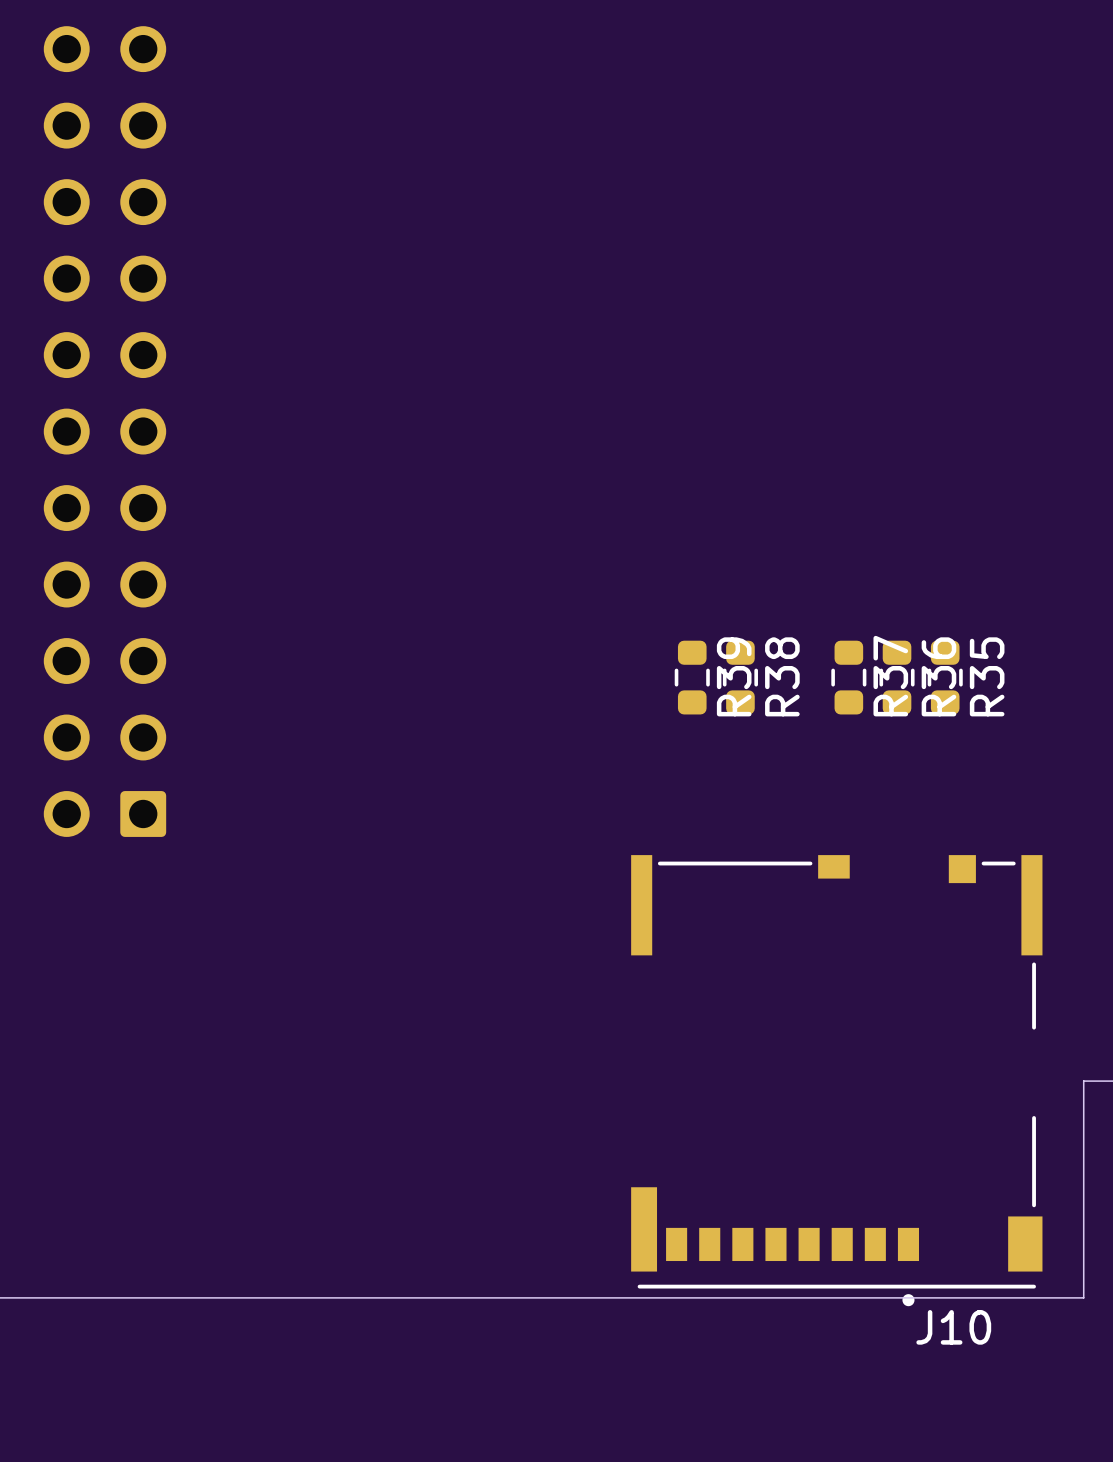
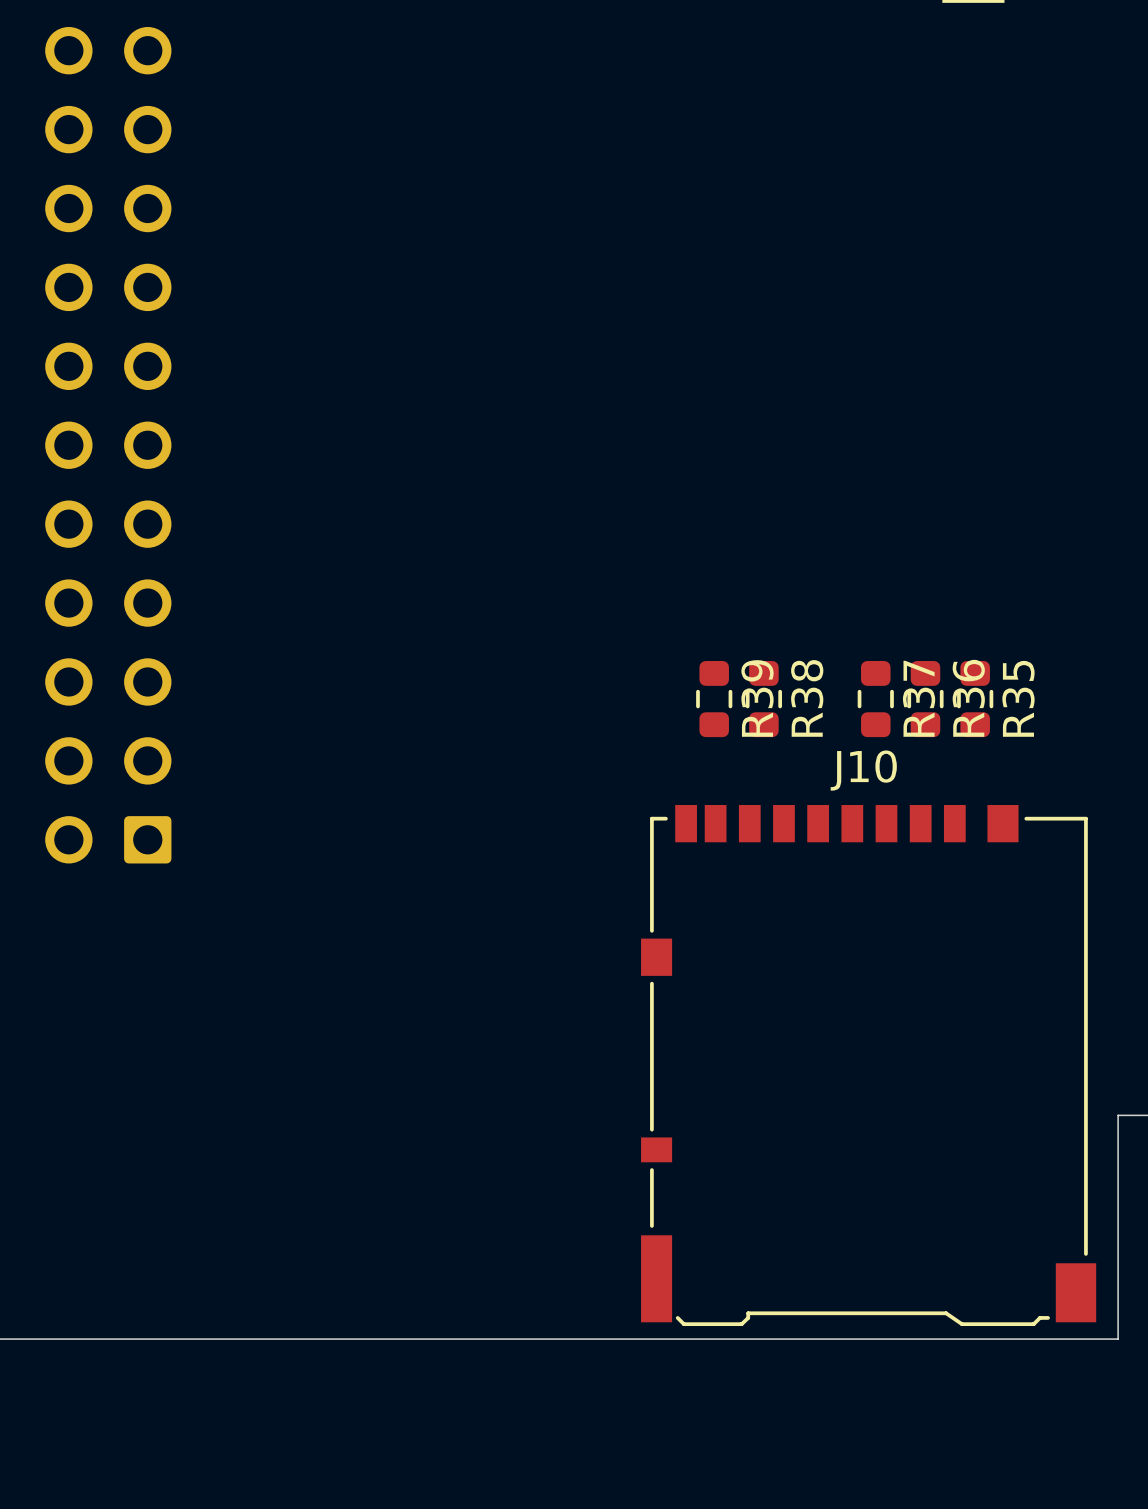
J10 footprint: [631, 855, 1043, 1307] -> [641, 805, 1097, 1327]
J10 name position: J10 (953, 1327) -> J10 (863, 770)

